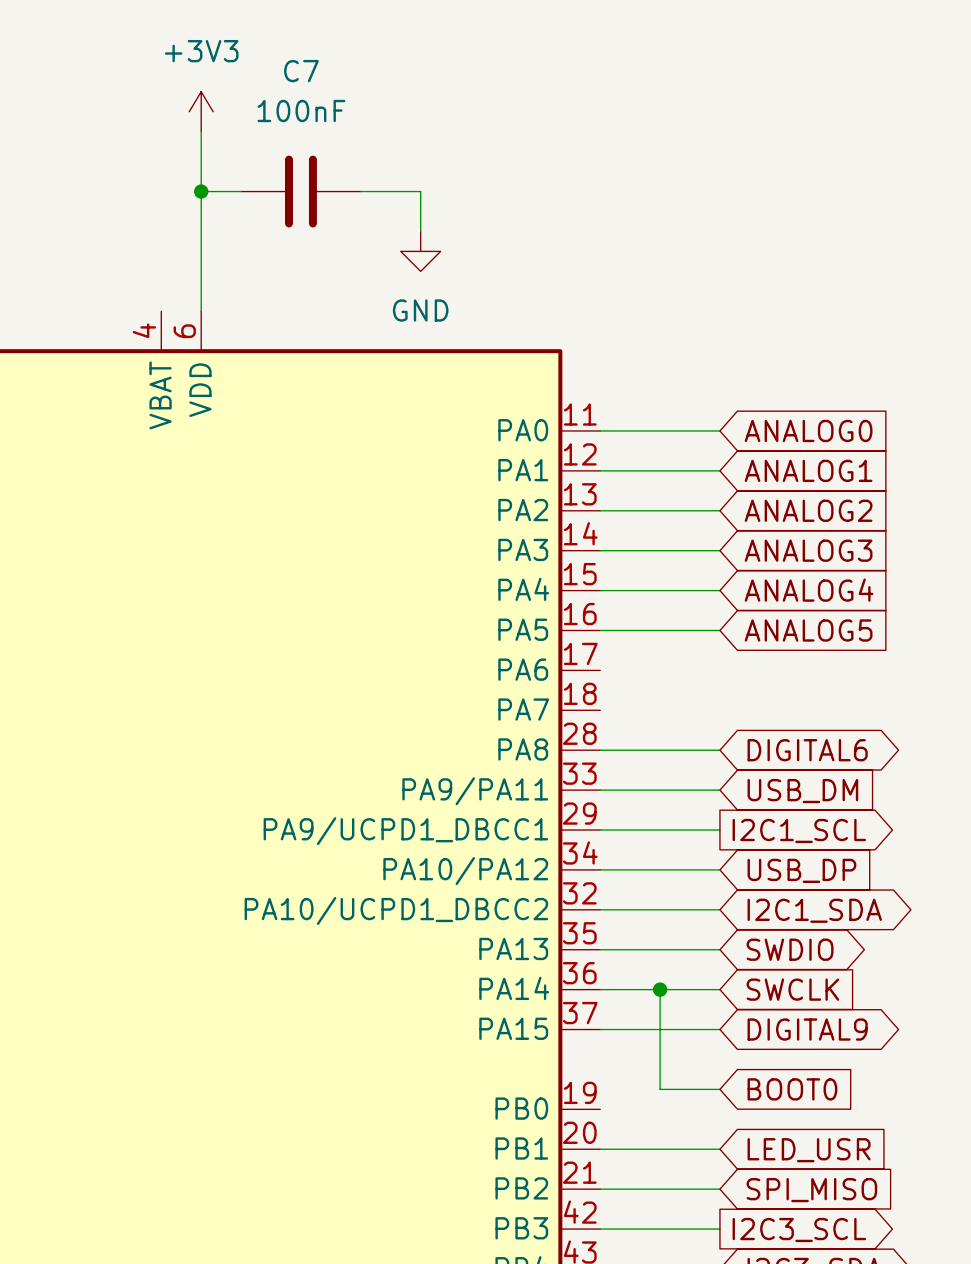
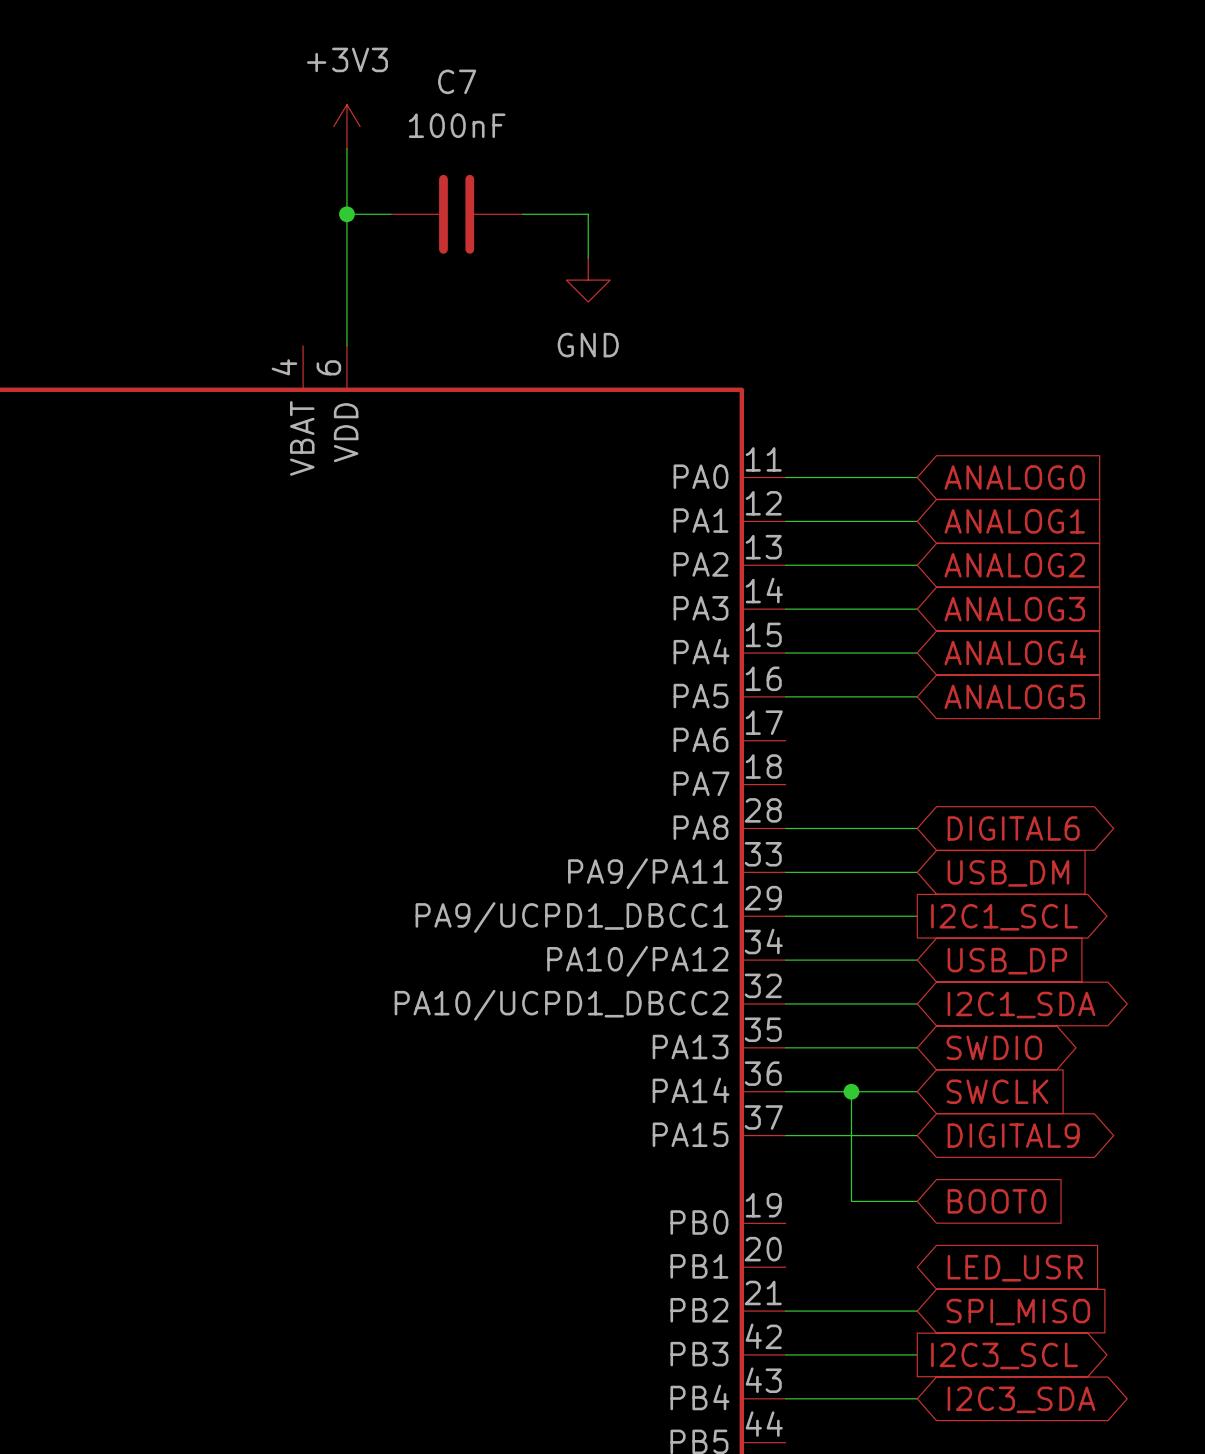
wire: (600, 1149) (719, 1149) -> none

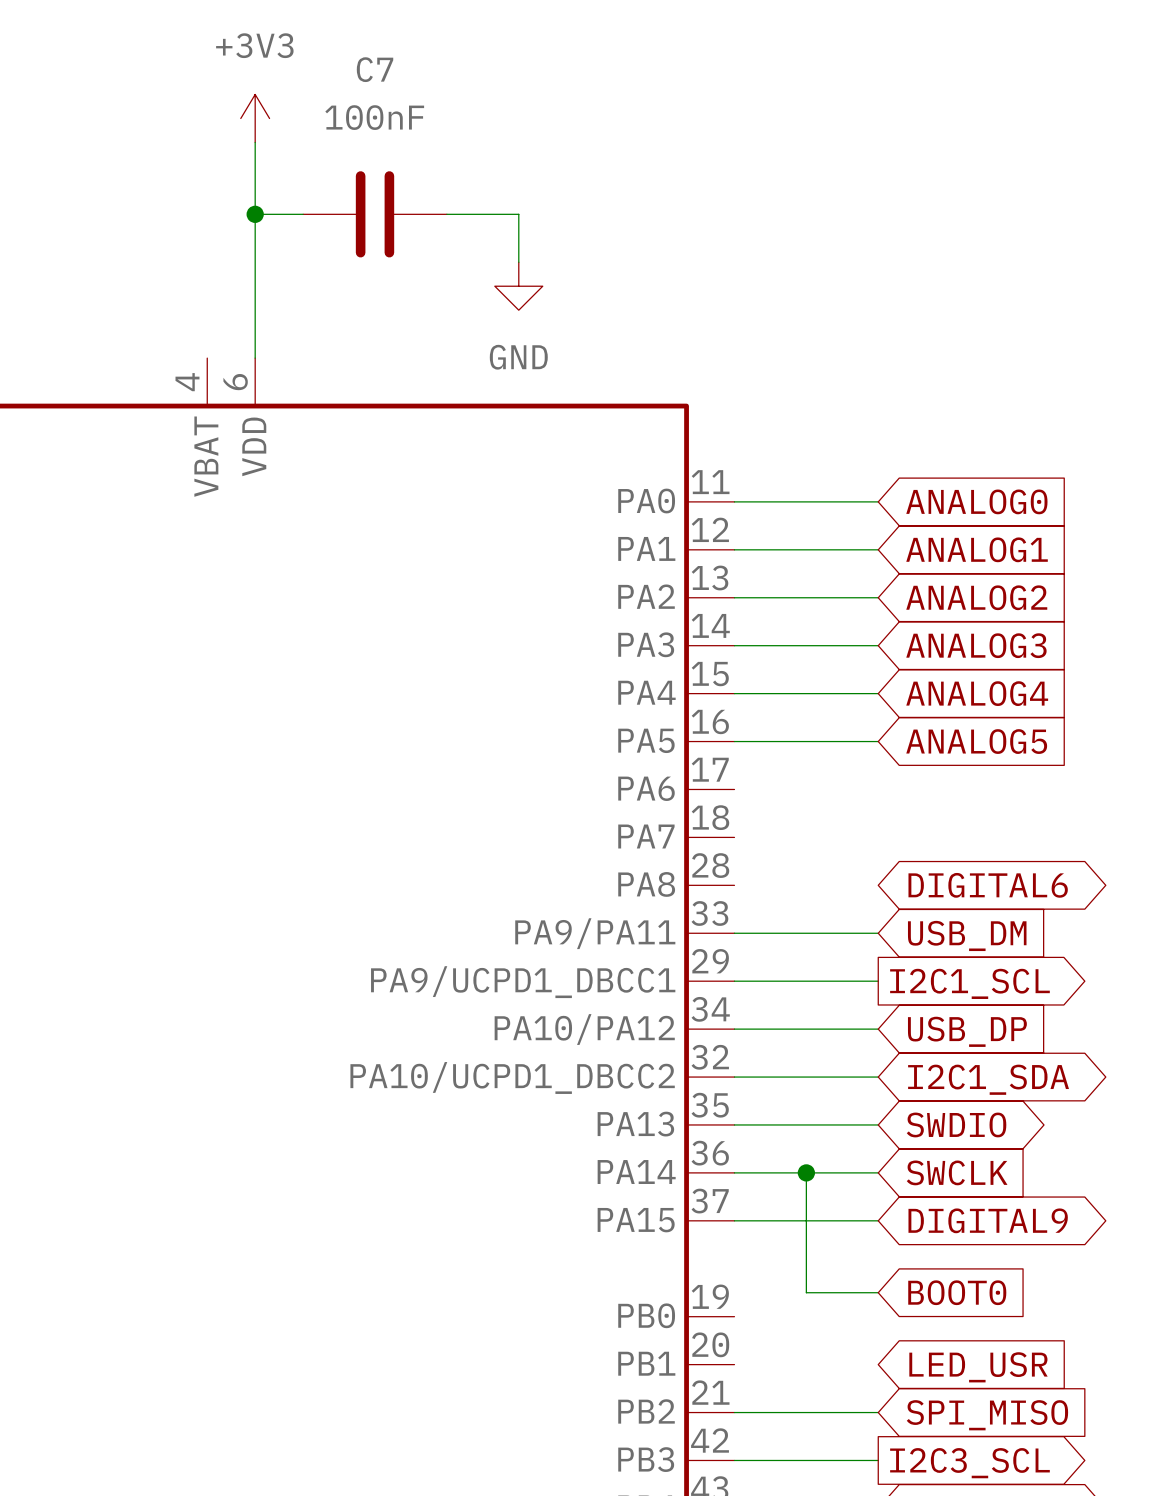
wire: (785, 828) (917, 828) -> none

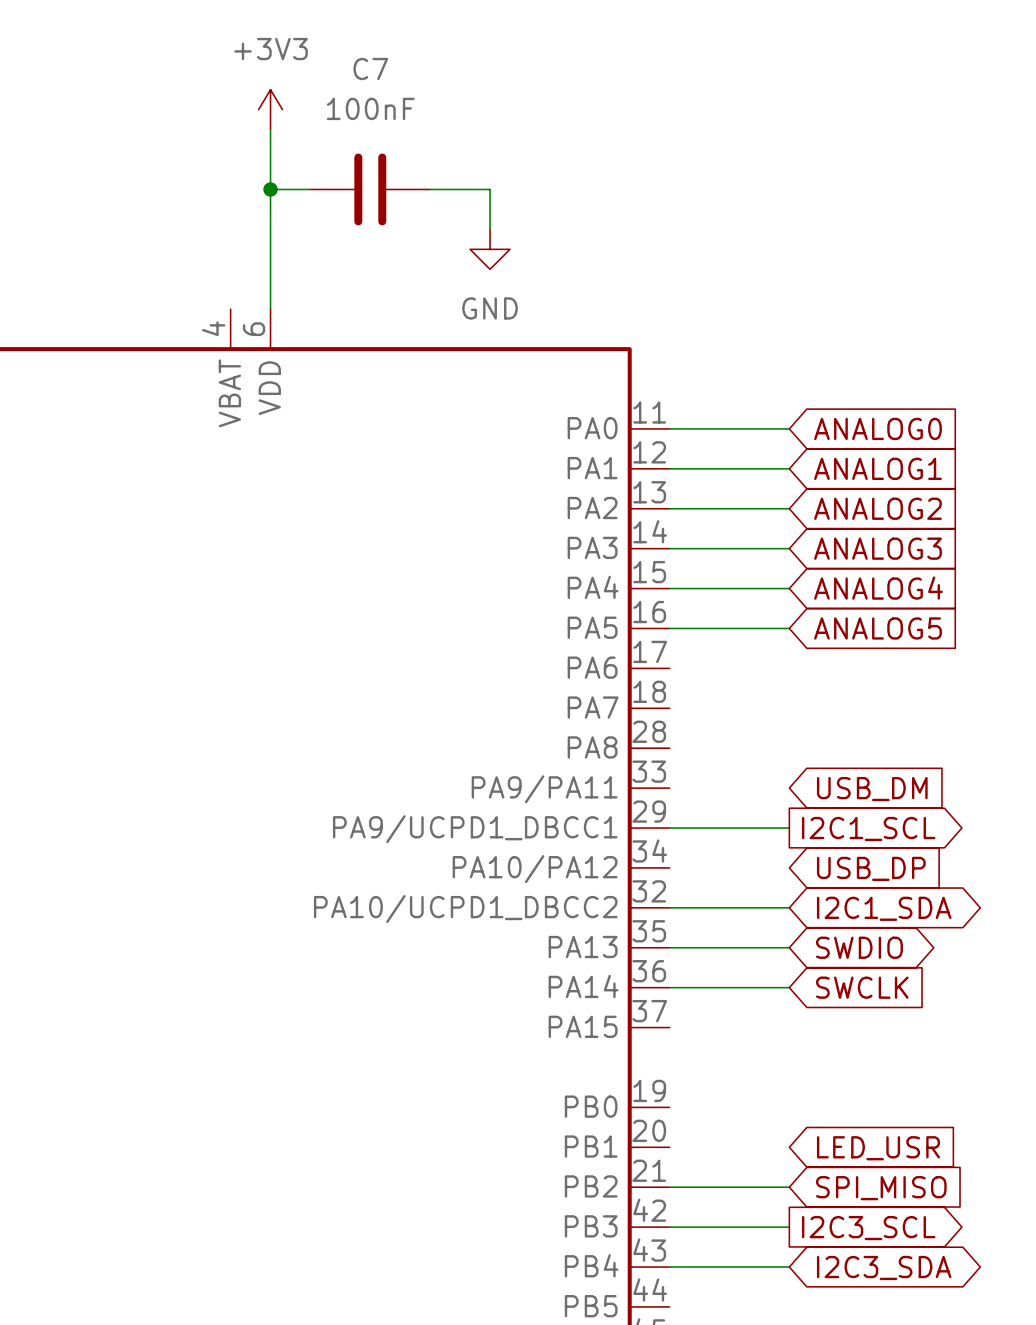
global label: DIGITAL6 (988, 885) -> none
wire: (734, 933) (878, 933) -> none
wire: (734, 1029) (878, 1029) -> none
wire: (806, 1172) (806, 1292) (878, 1292) -> none
junction: (806, 1172) -> none
wire: (734, 1220) (878, 1220) -> none
global label: DIGITAL9 (988, 1220) -> none
global label: BOOT0 (957, 1292) -> none

